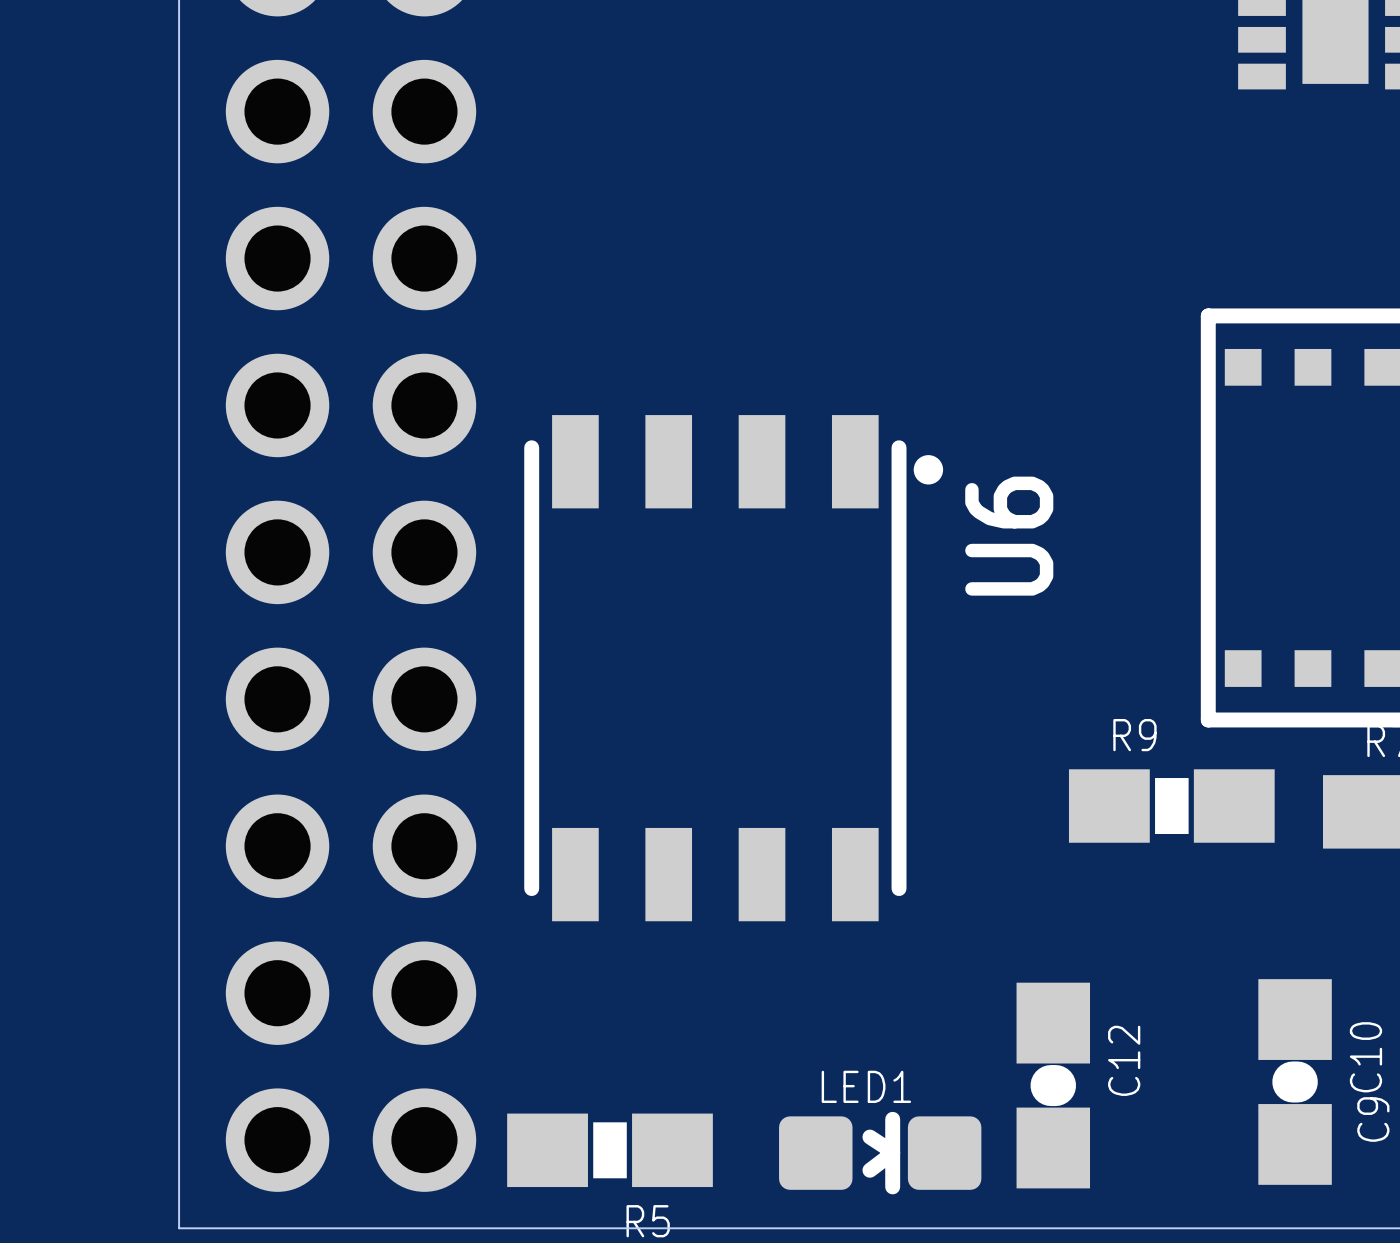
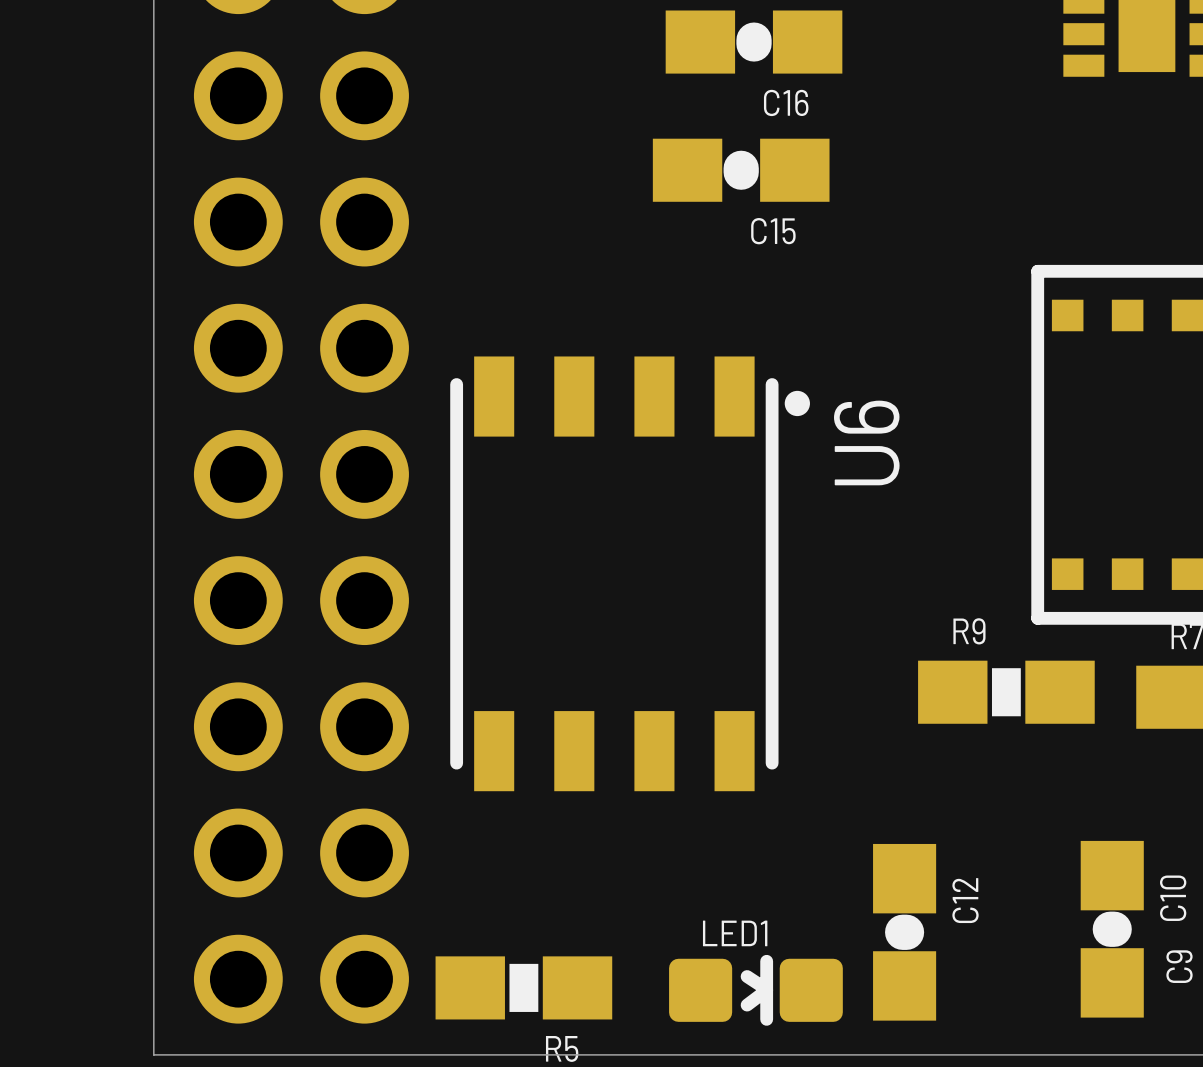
C16: none -> (754, 42)
C15: none -> (741, 170)

